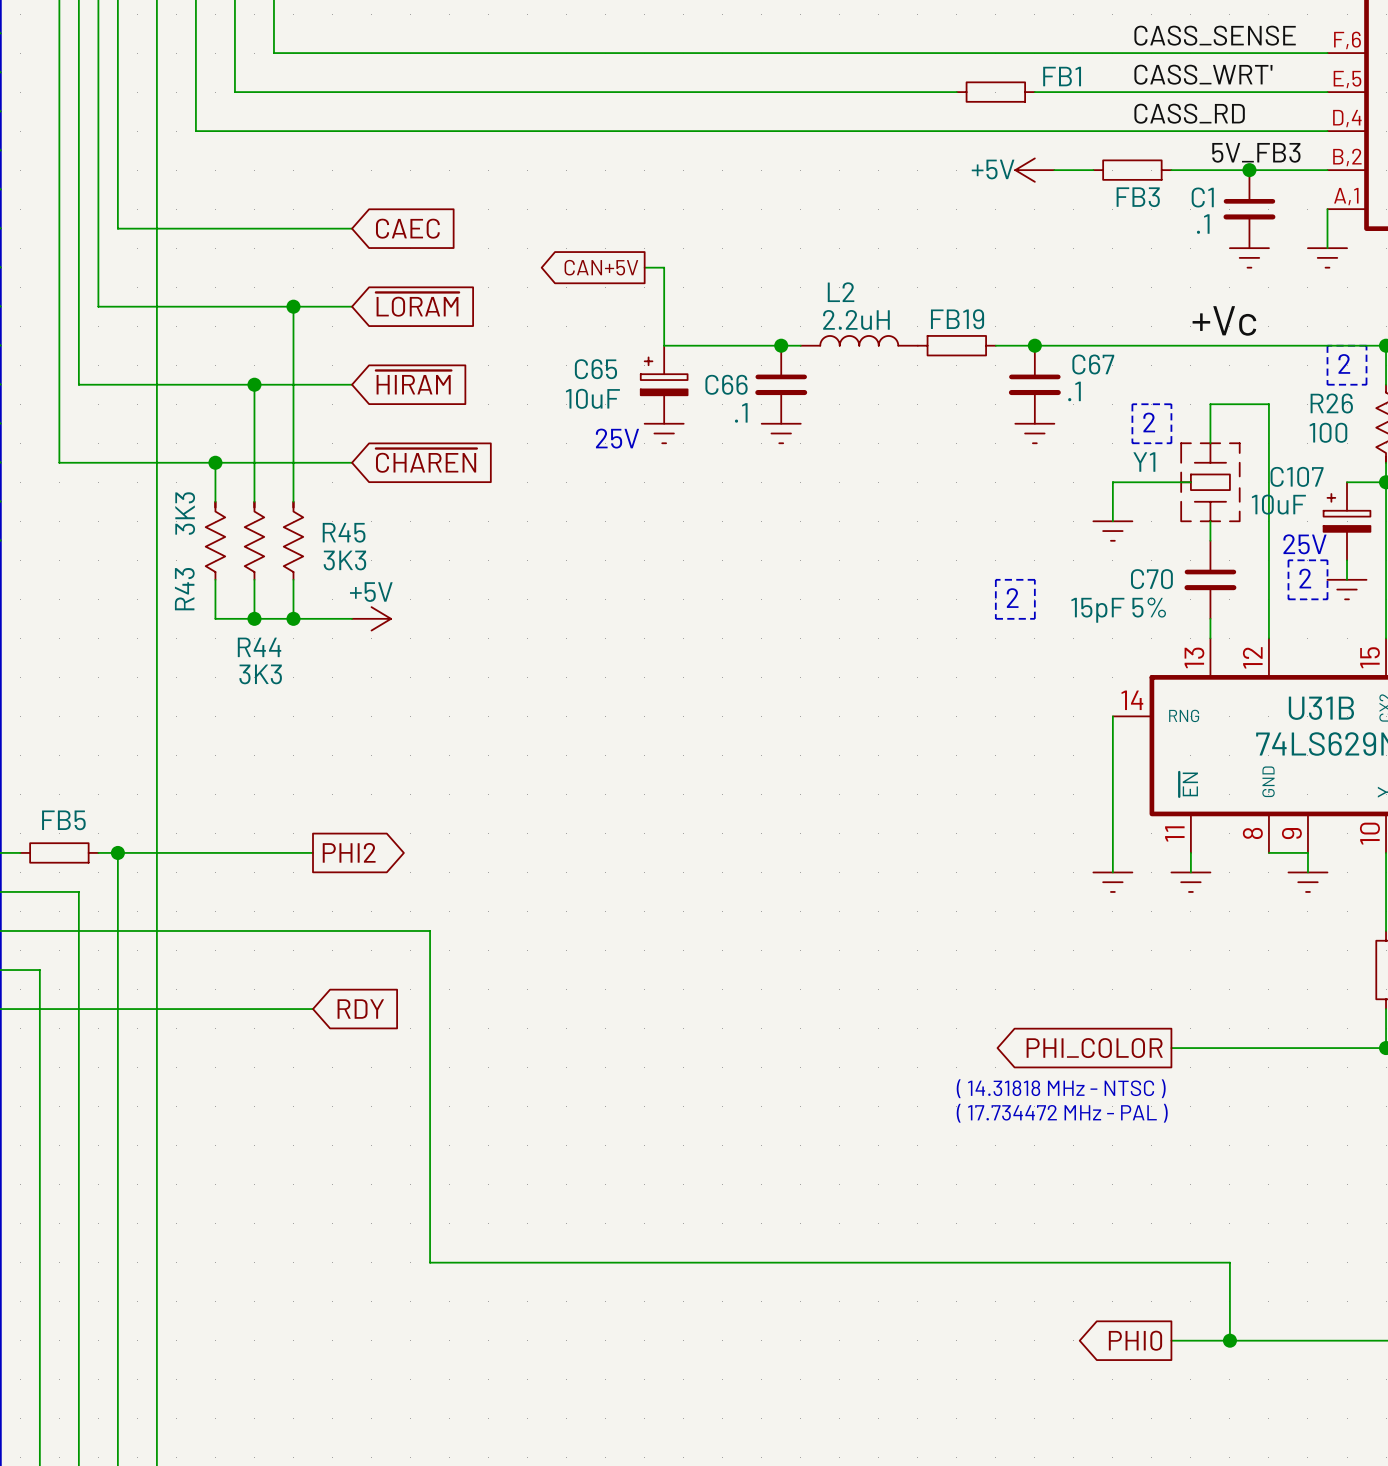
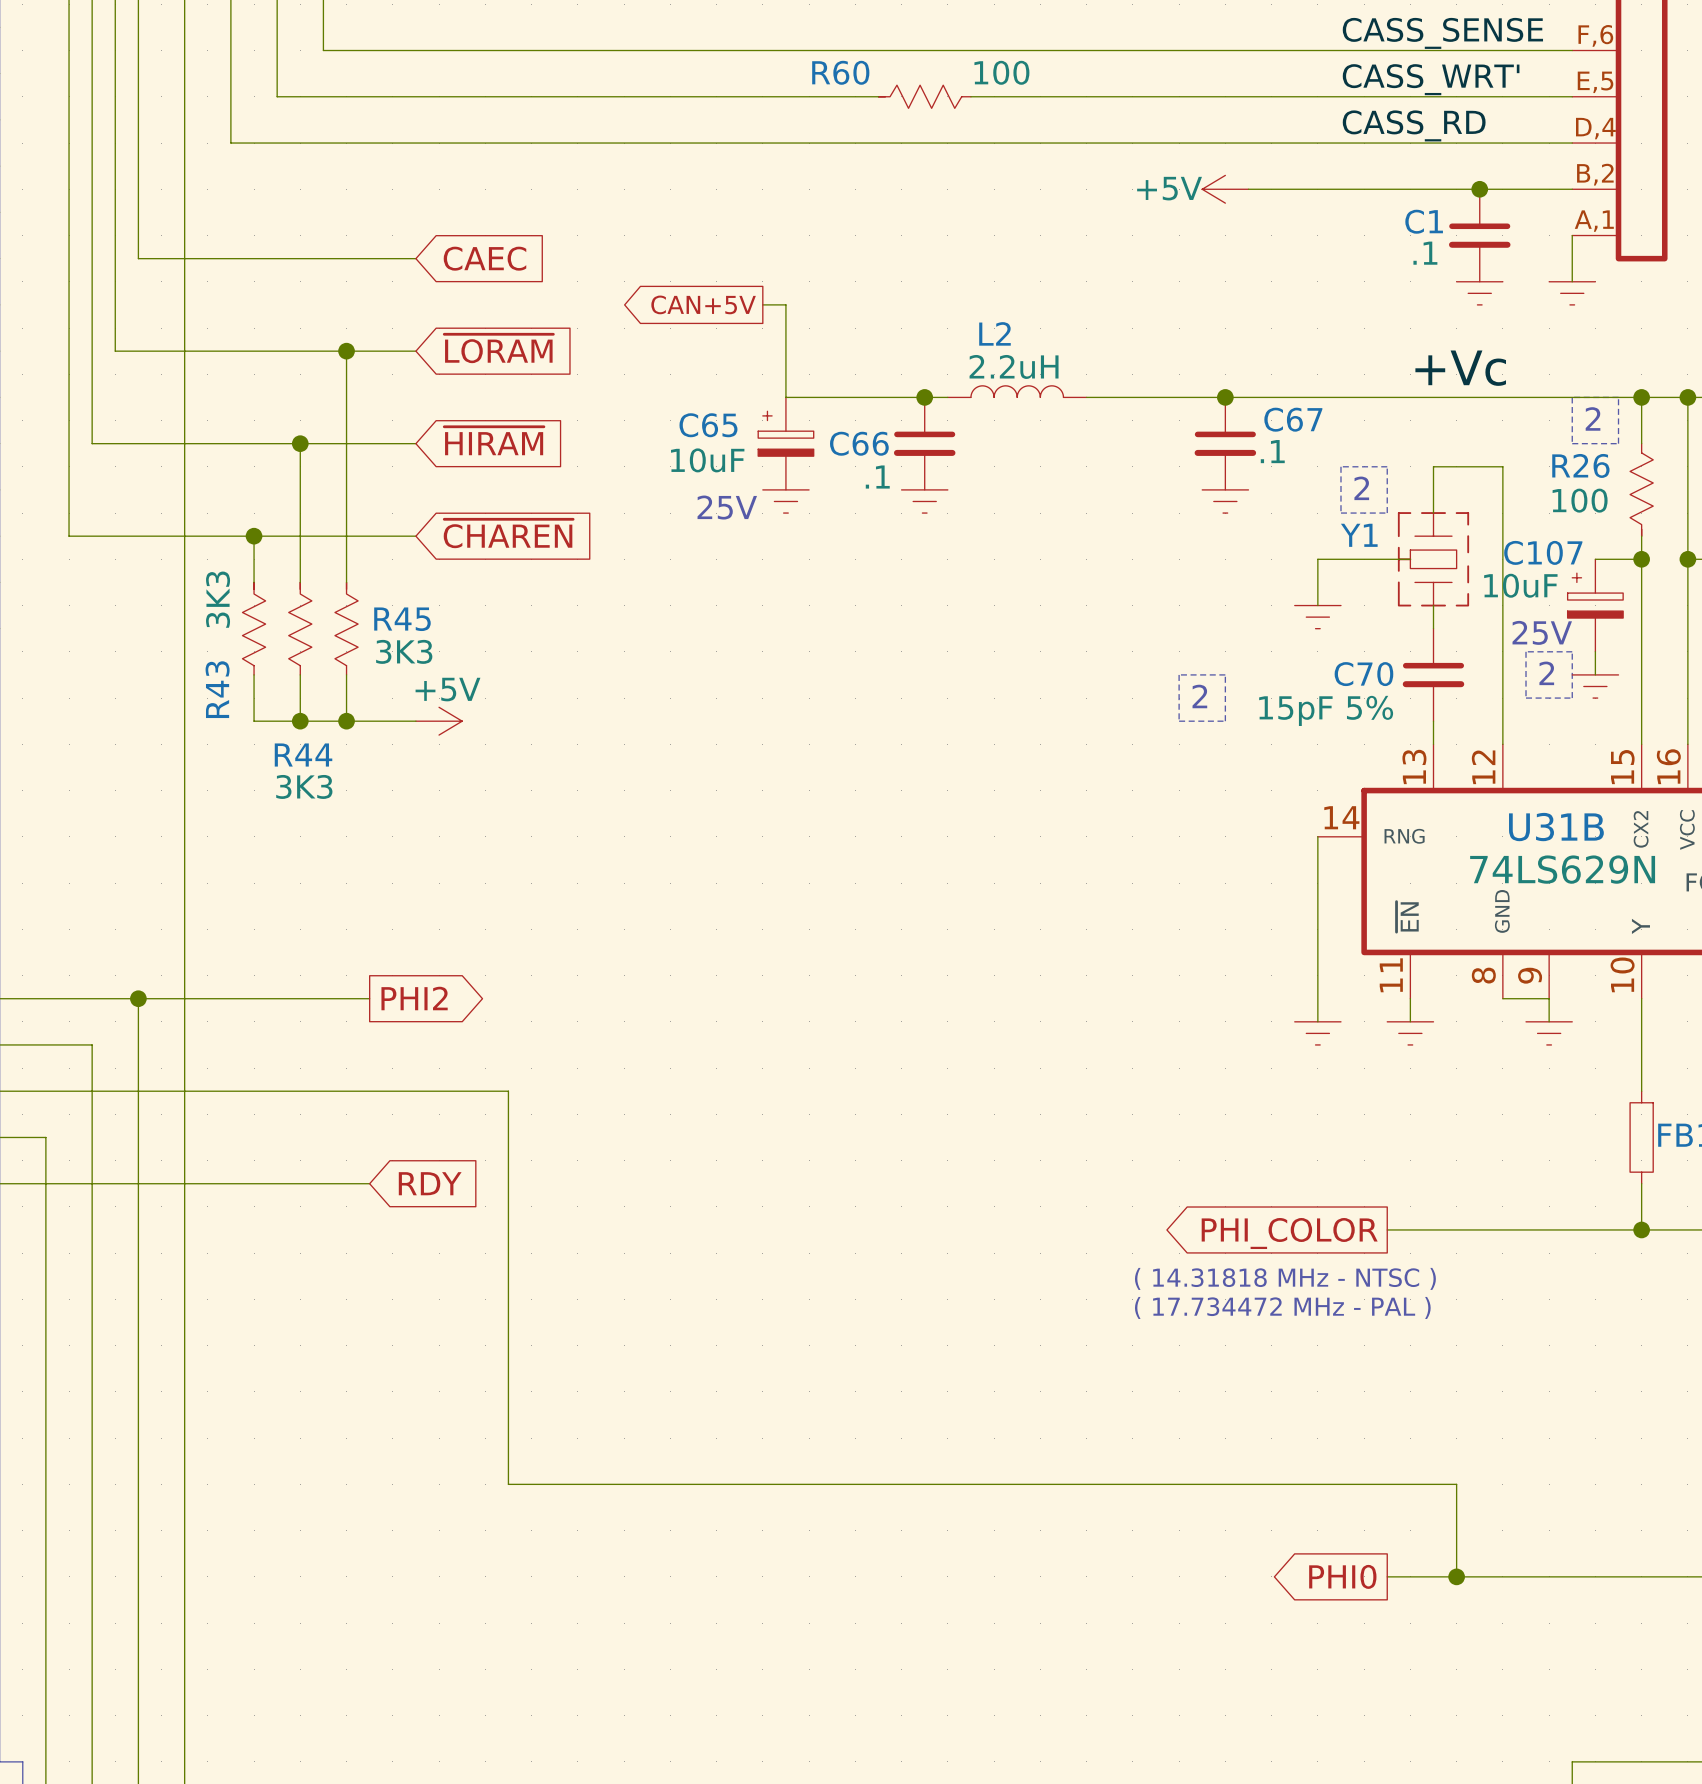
wire: (742, 92) (820, 92) -> (1132, 96) (1225, 96)
R60: none -> 100 (924, 96)
FB1: (995, 92) -> none
label: 5V_FB3 (1256, 152) -> none
wire: none -> (1294, 189) (1387, 189)
FB3: (1132, 170) -> none
wire: none -> (1086, 397) (1179, 397)
FB19: (956, 345) -> none
wire: none -> (22, 998) (115, 998)
FB5: (59, 852) -> none

